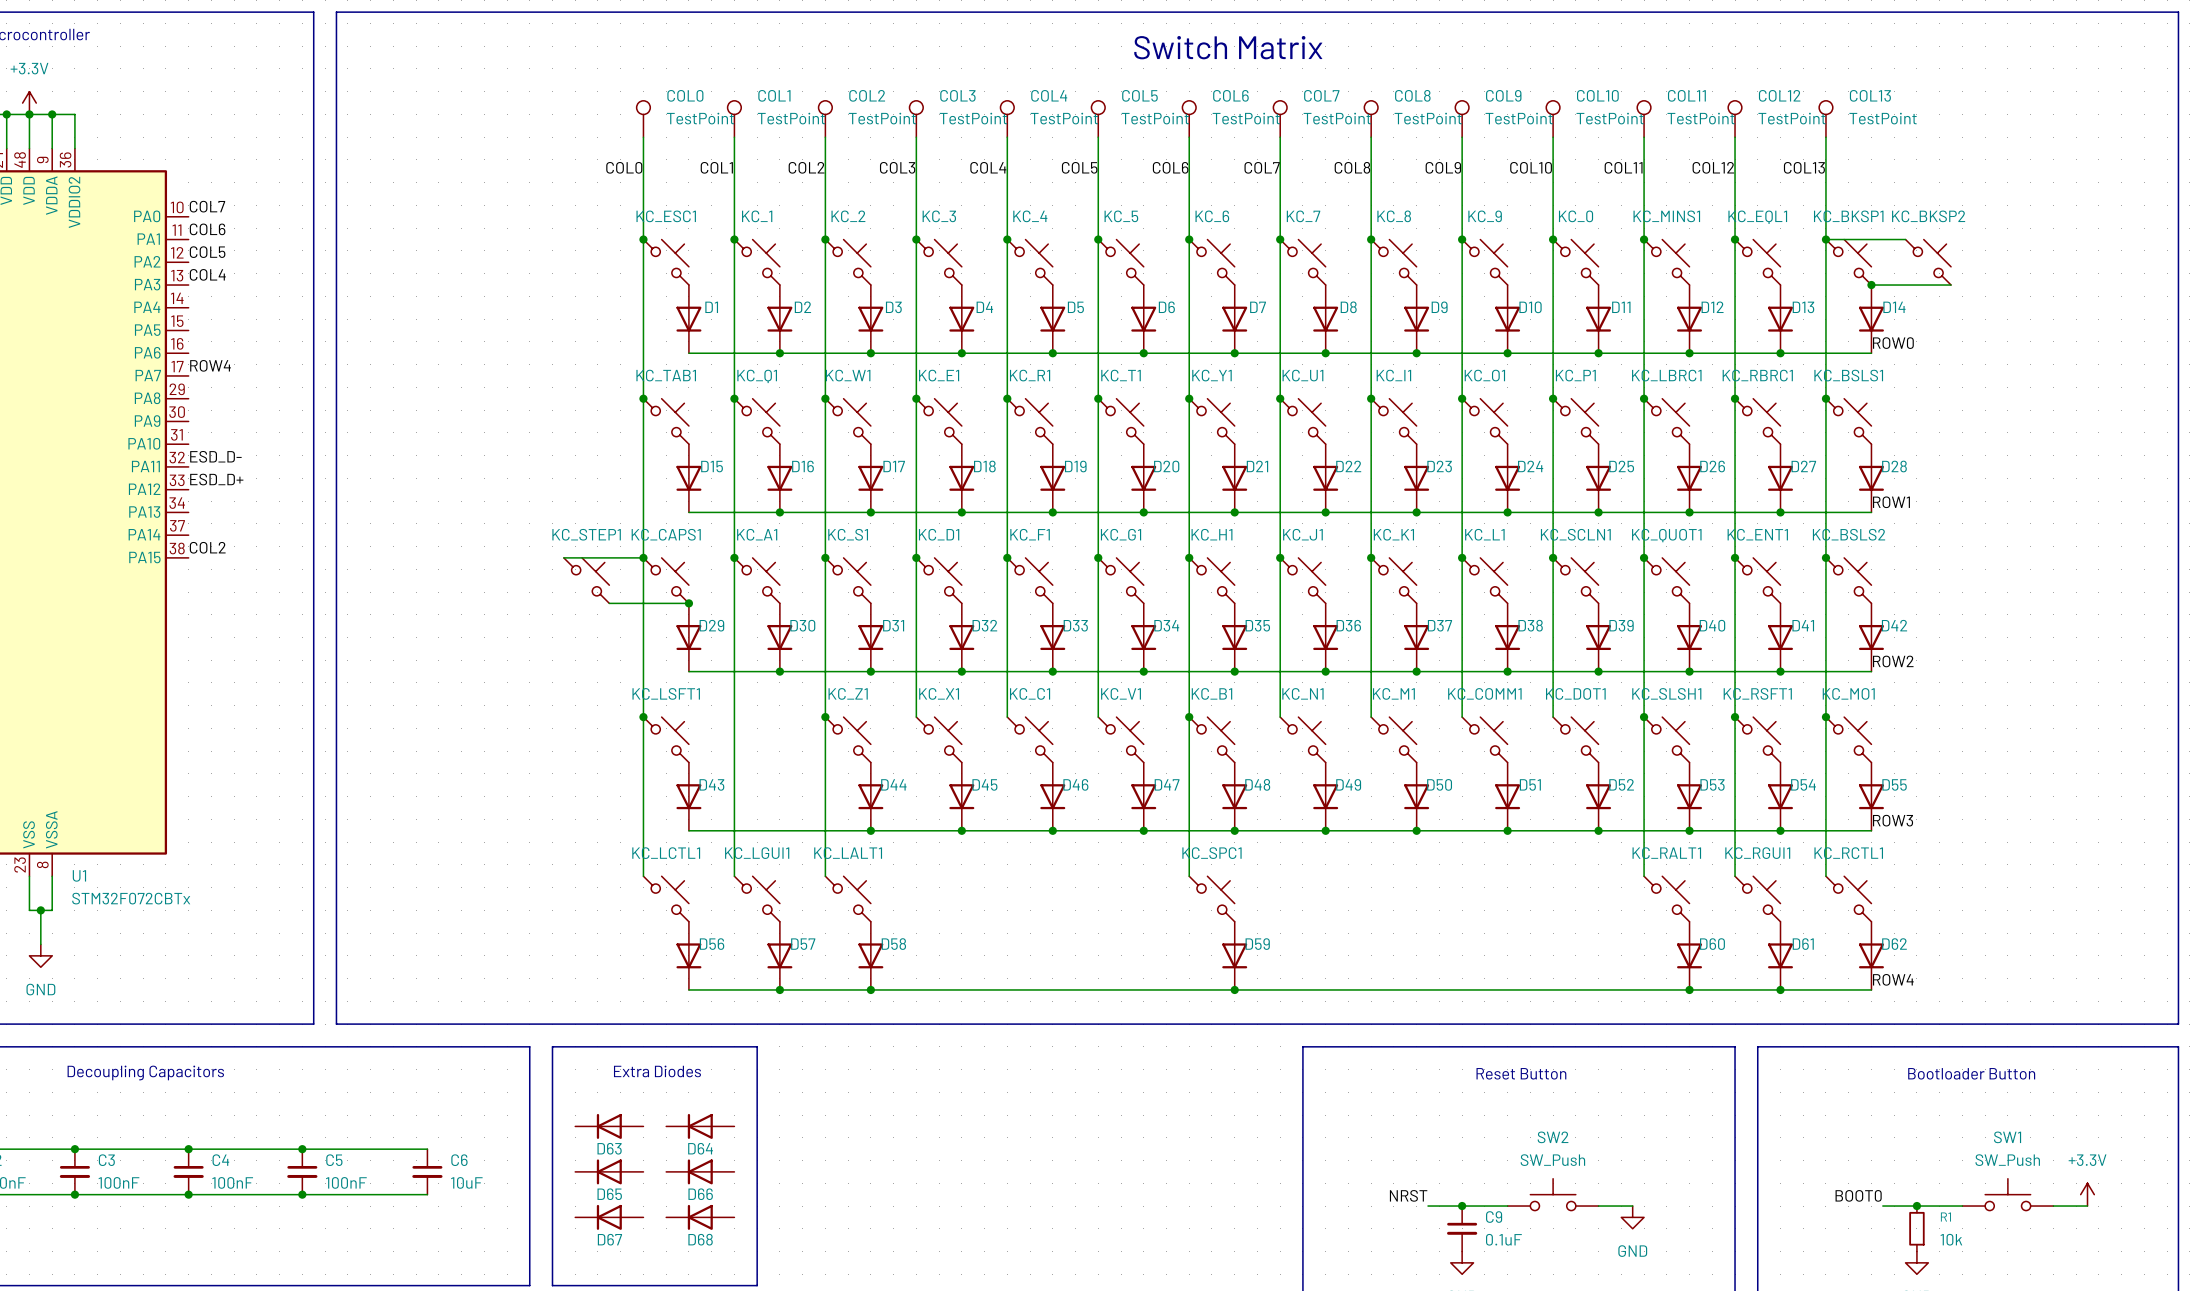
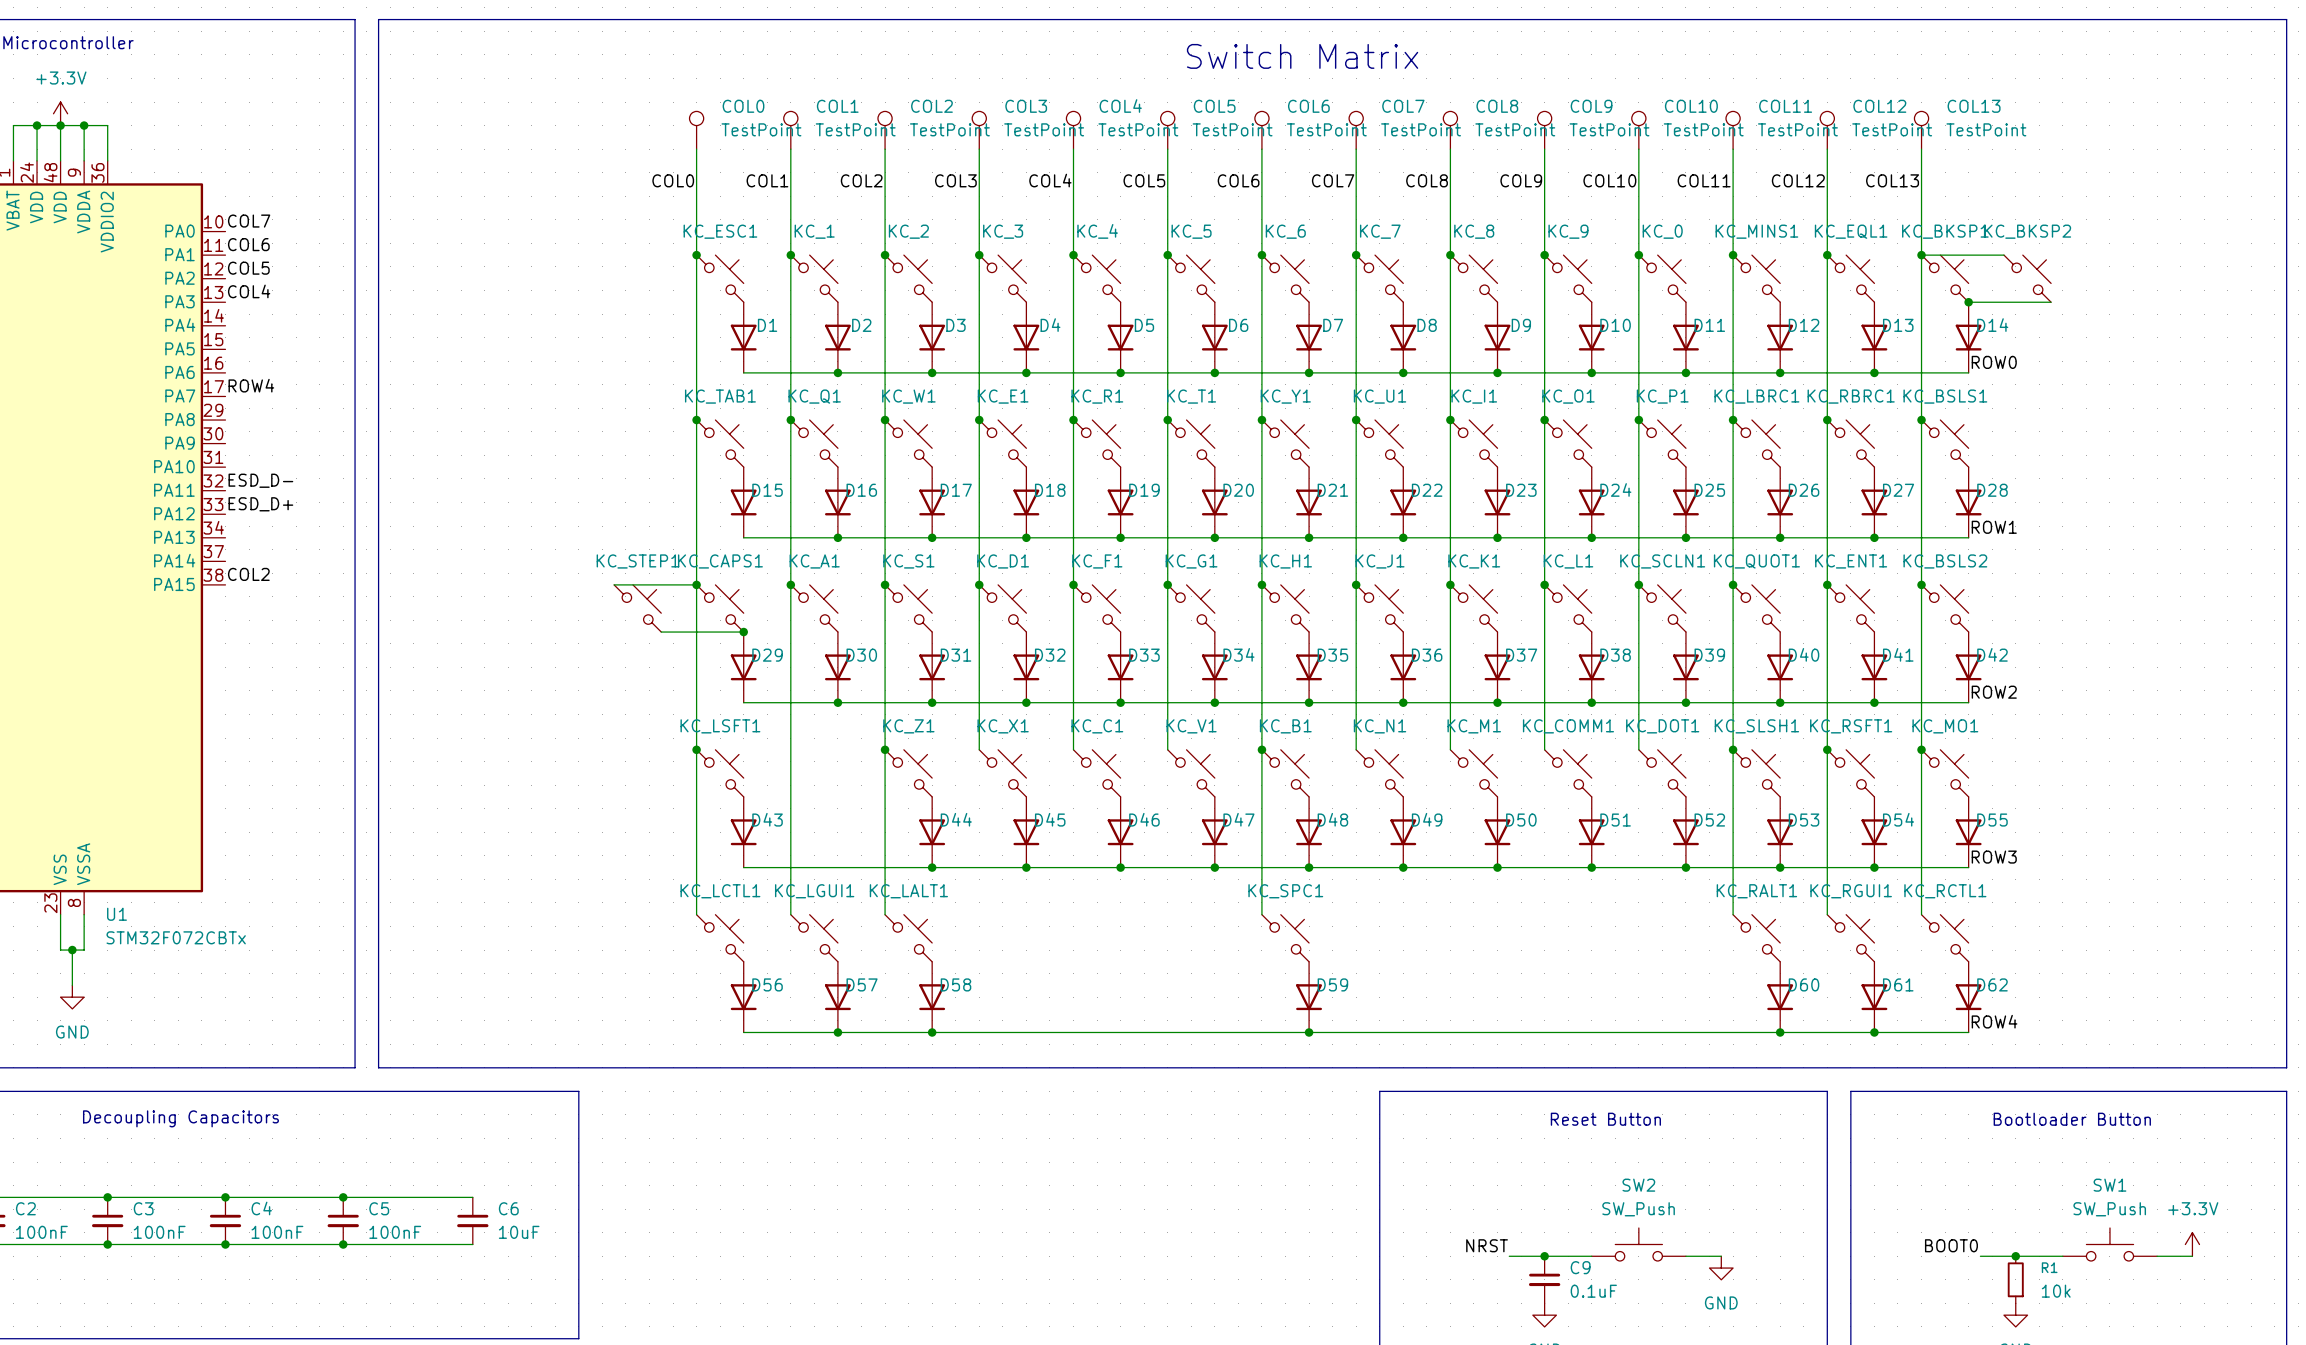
line: (552, 1046) (757, 1046) (757, 1285) (552, 1285) (552, 1046) -> none
text: Extra Diodes (657, 1071) -> none
D63: (609, 1126) -> none
D64: (700, 1126) -> none
D65: (609, 1171) -> none
D66: (700, 1171) -> none
D67: (609, 1217) -> none
D68: (700, 1217) -> none

